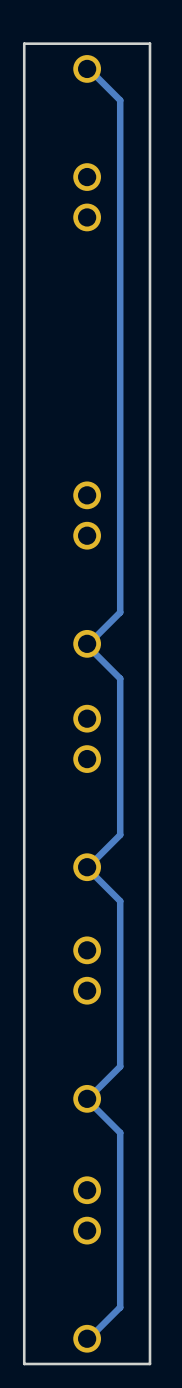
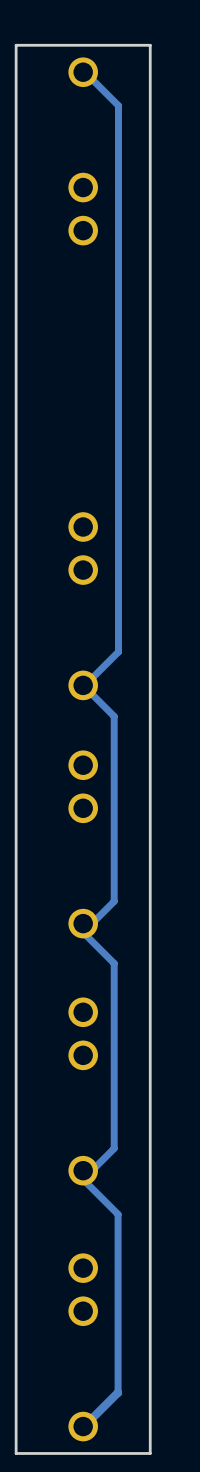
bottom track: none -> (83, 685) (114, 716) (114, 901) (83, 932) (114, 963) (114, 1148) (83, 1179) (118, 1214) (118, 1391) (83, 1426)
bottom track: (87, 645) (120, 678) (120, 834) (87, 868) (120, 901) (120, 1066) (87, 1099) (120, 1132) (120, 1307) -> none

